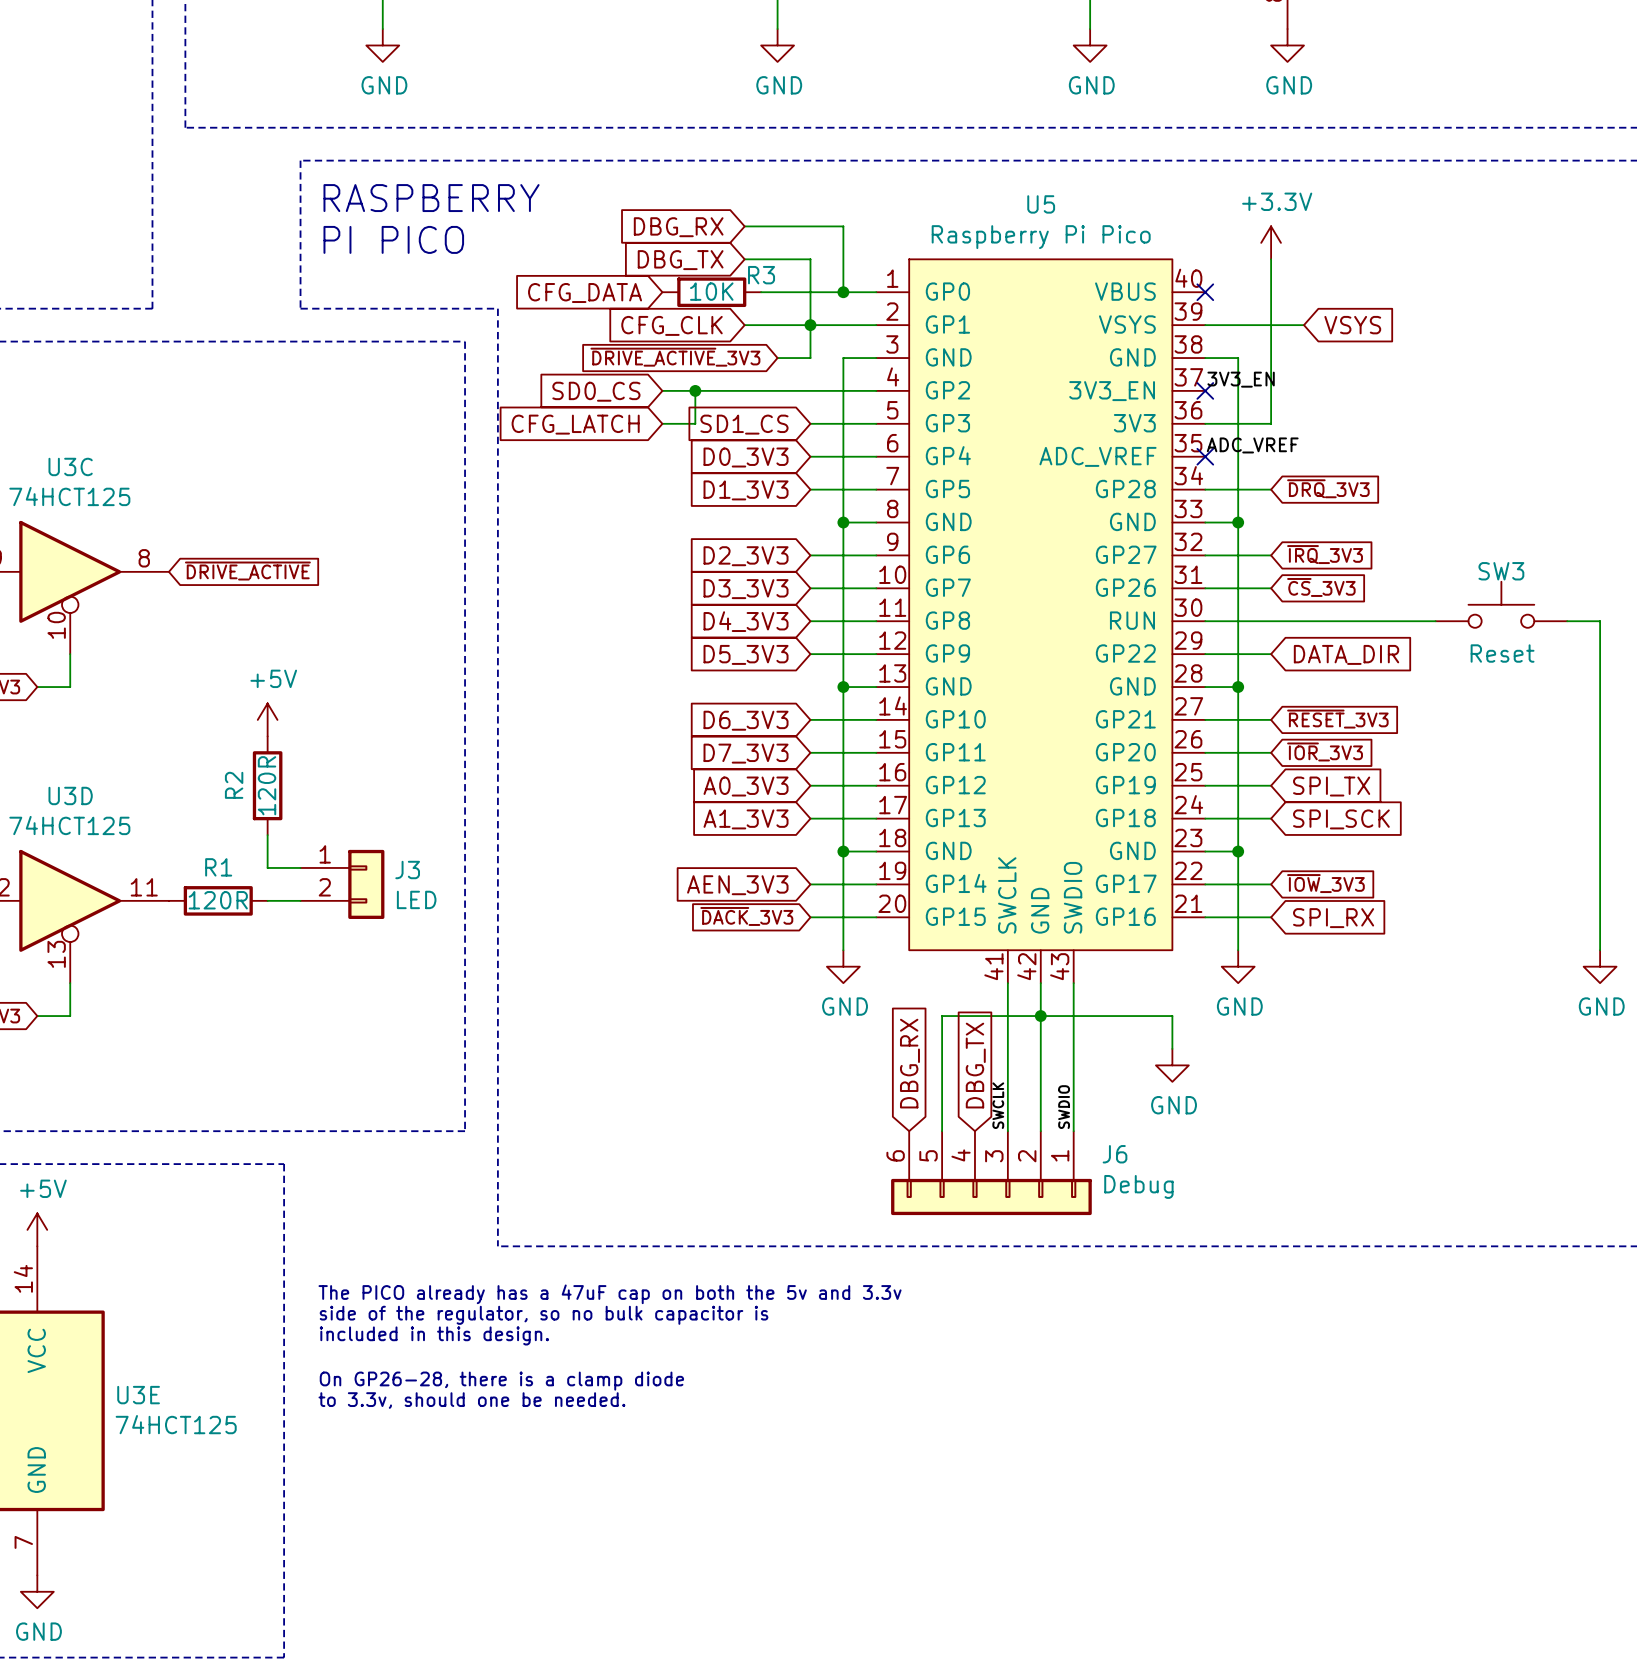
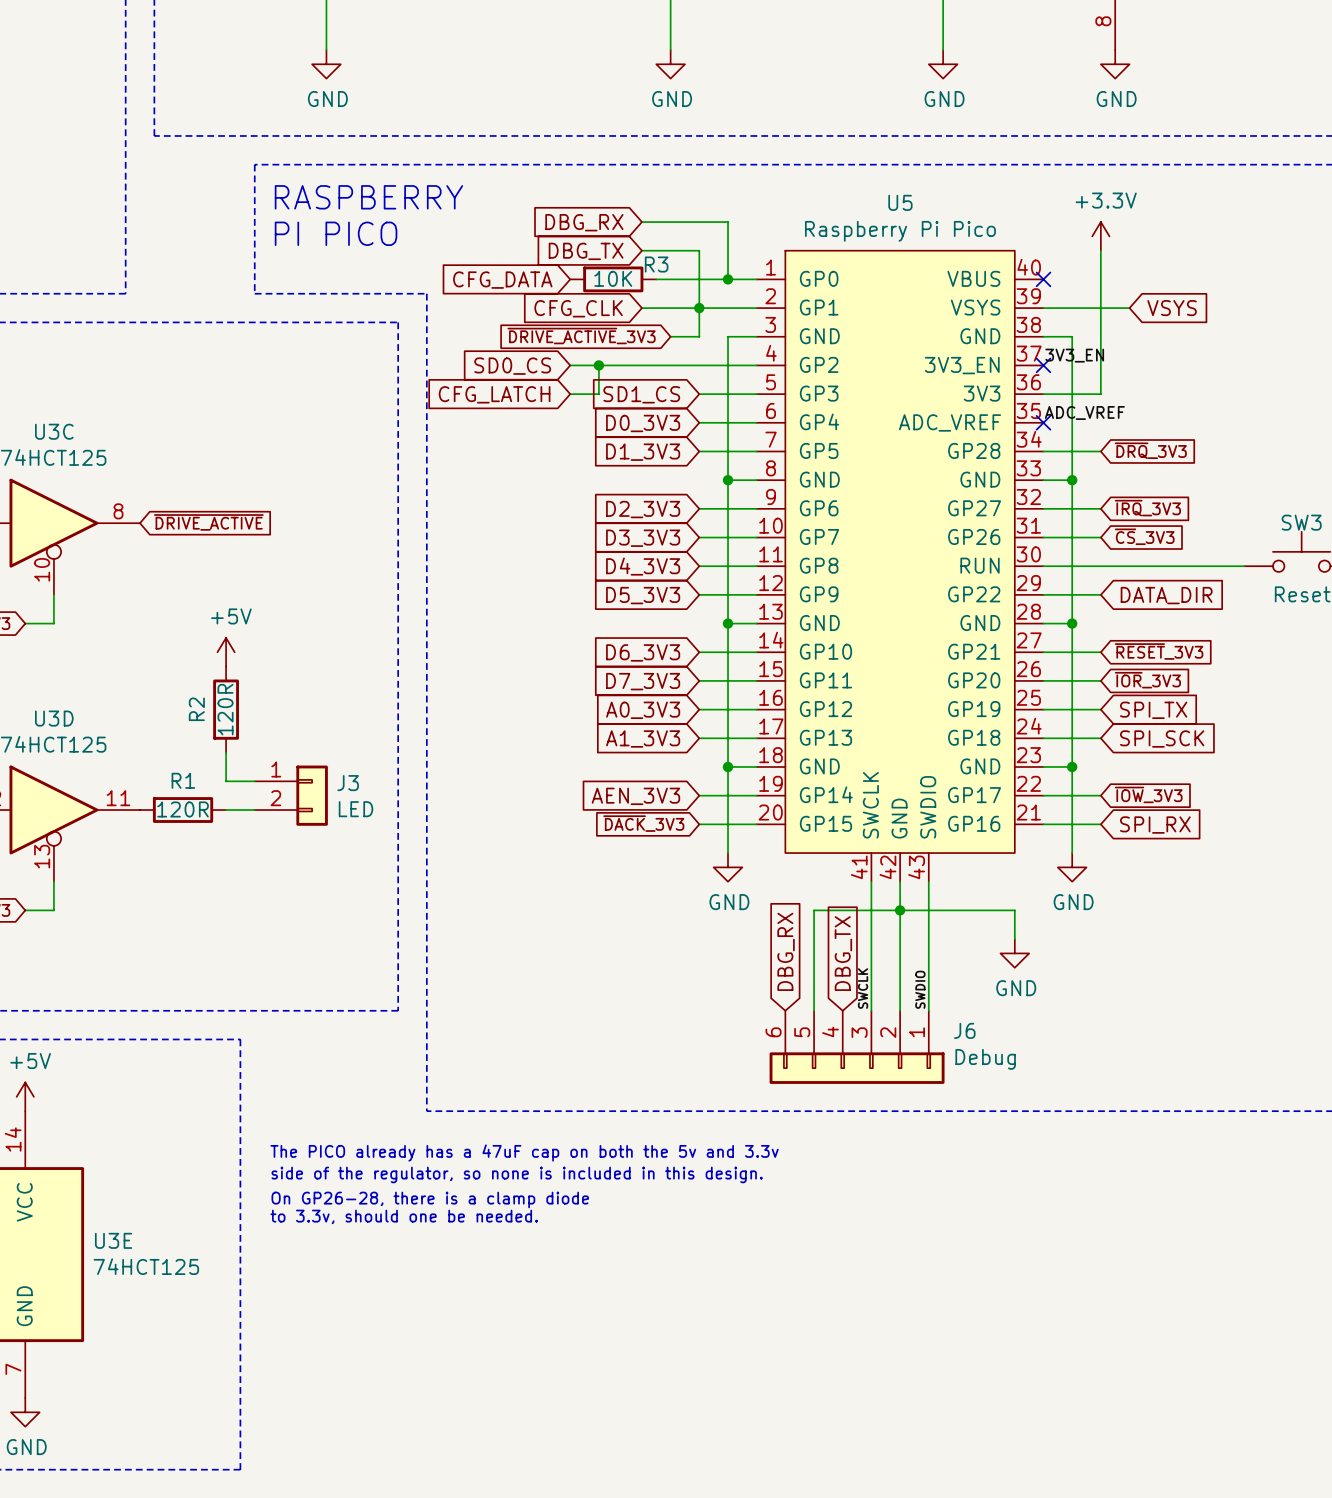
text: side of the regulator, so no bulk capacitor is (544, 1315) -> side of the regulator, so none is included in this design. (517, 1174)
text: included in this design. (434, 1335) -> none
text: none -> On GP26-28, there is a clamp diode (430, 1199)
text: On GP26-28, there is a clamp diode (501, 1381) -> to 3.3v, should one be needed. (404, 1216)
text: to 3.3v, should one be needed. (471, 1400) -> none

